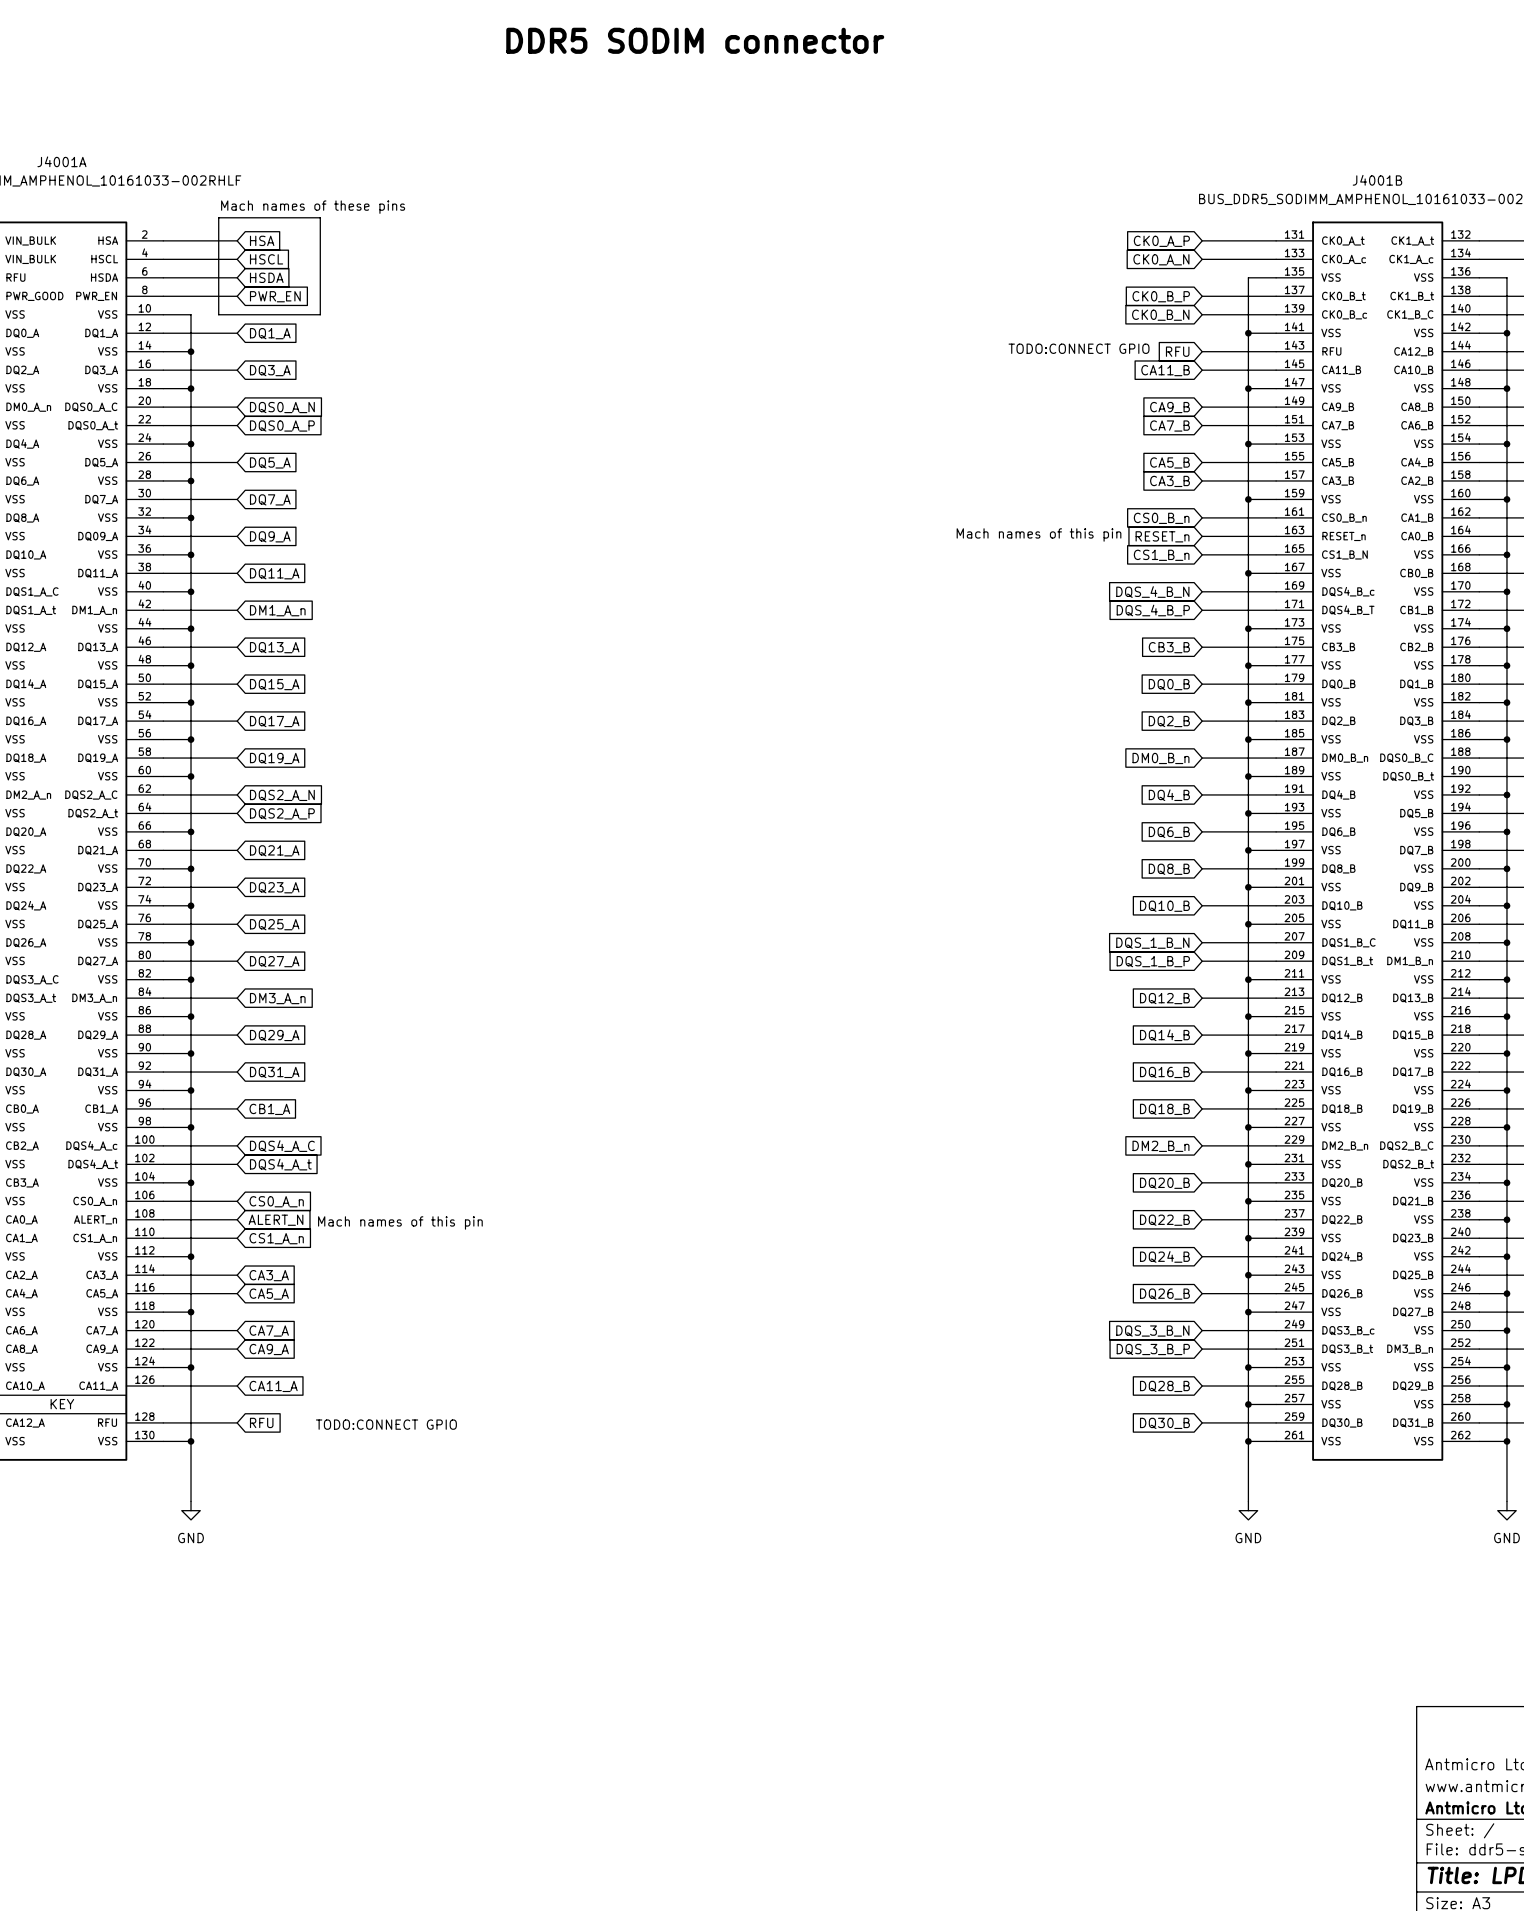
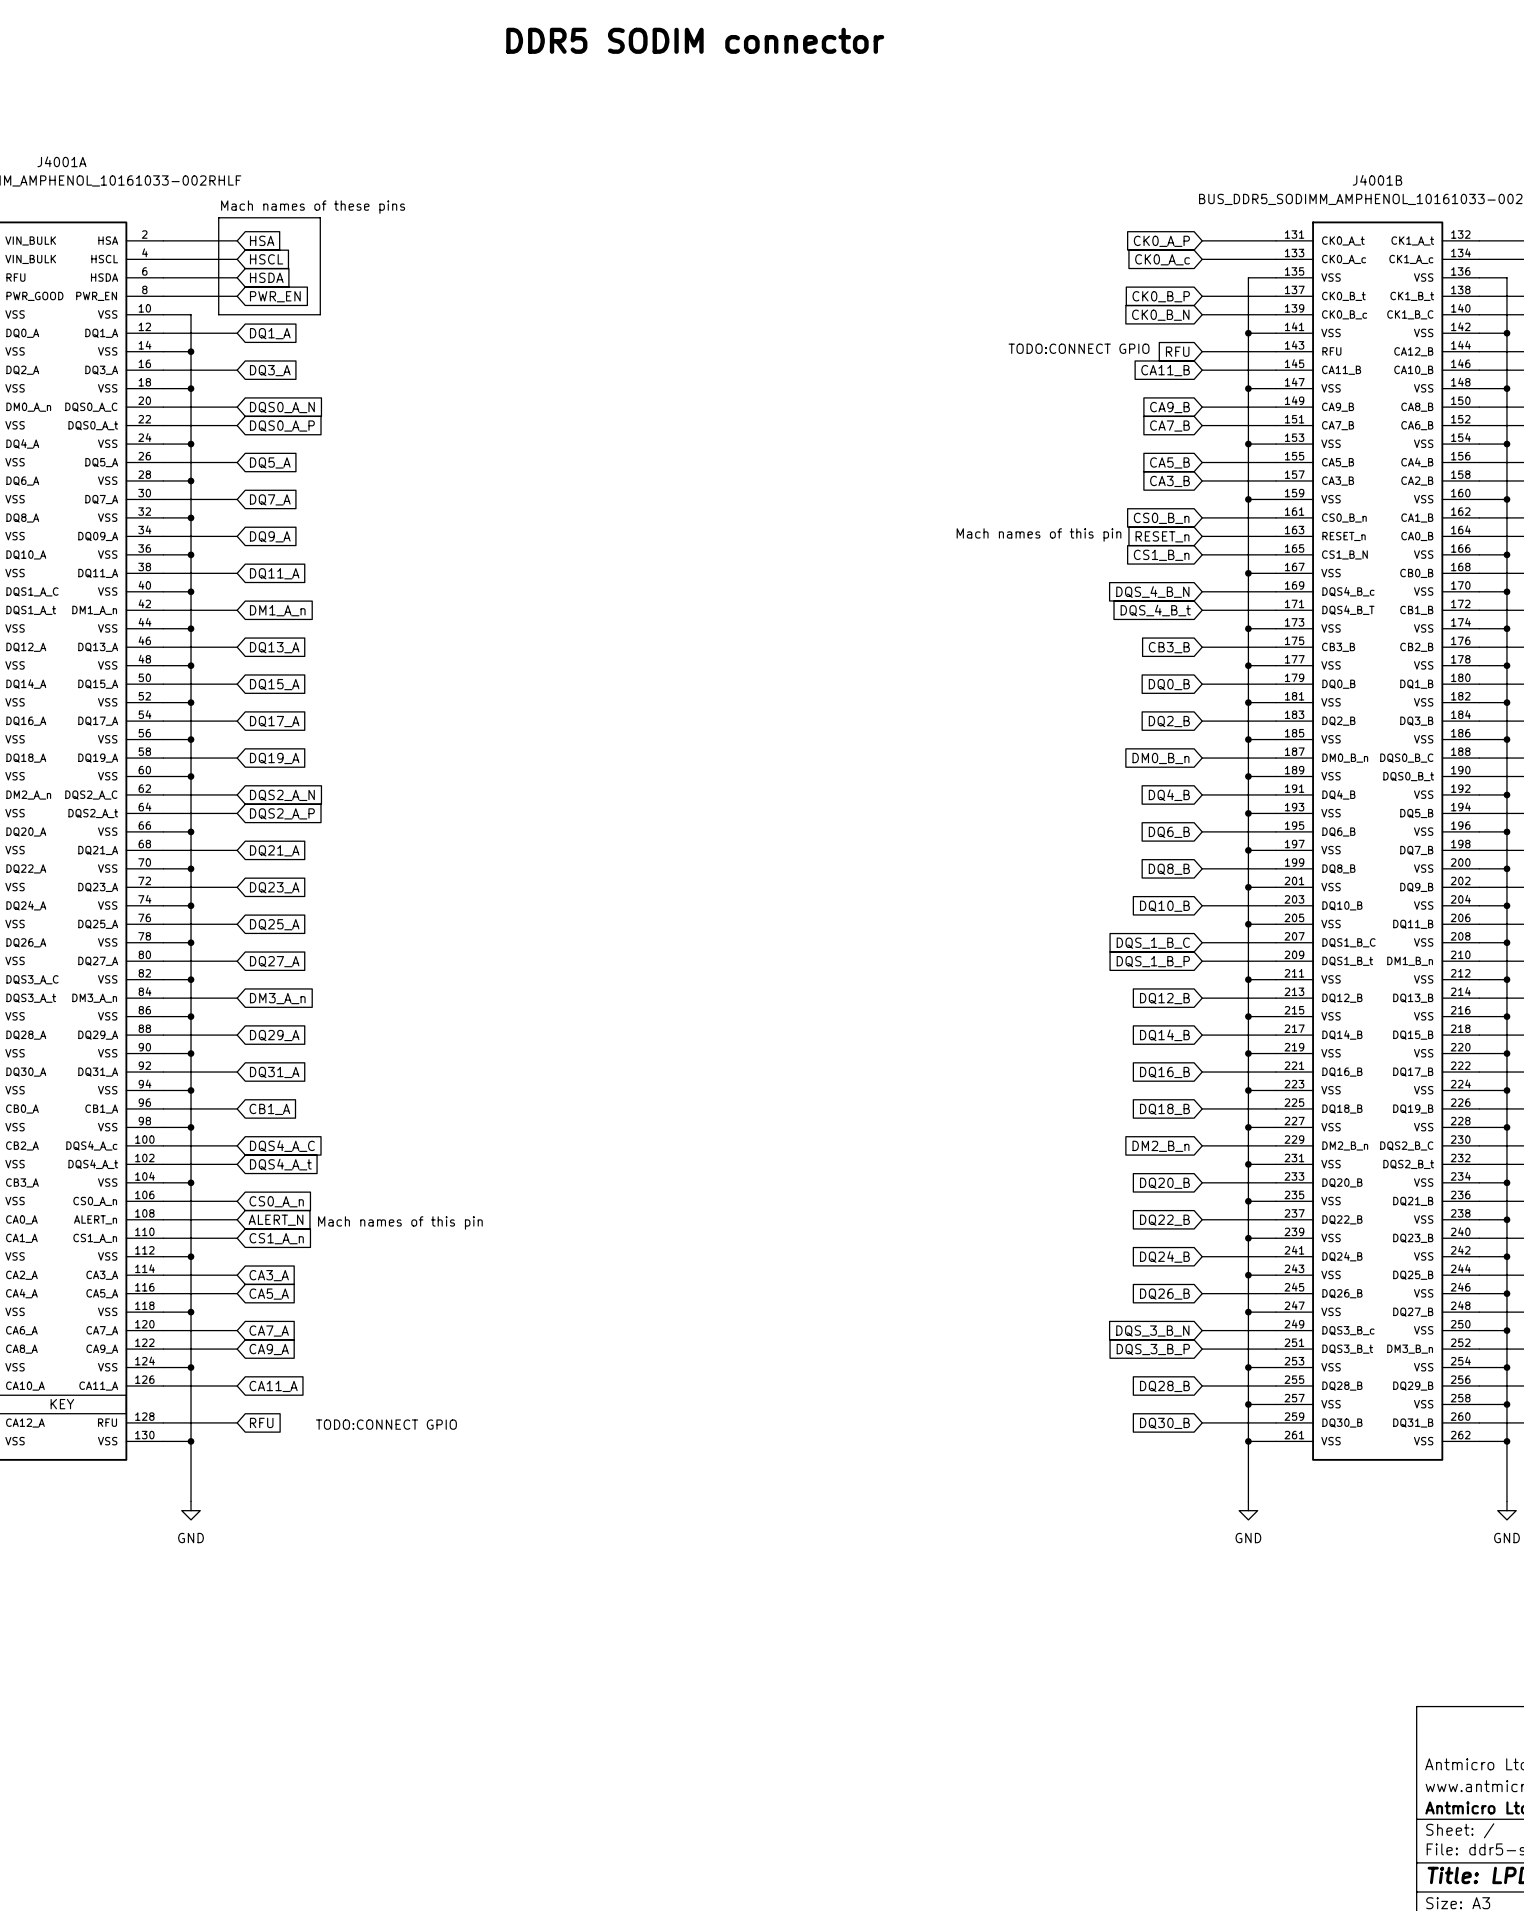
global label: CK0_A_N (1161, 259) -> CK0_A_c (1162, 259)
global label: DQS_4_B_P (1153, 610) -> DQS_4_B_t (1155, 610)
global label: DQS_1_B_N (1152, 943) -> DQS_1_B_C (1153, 943)

